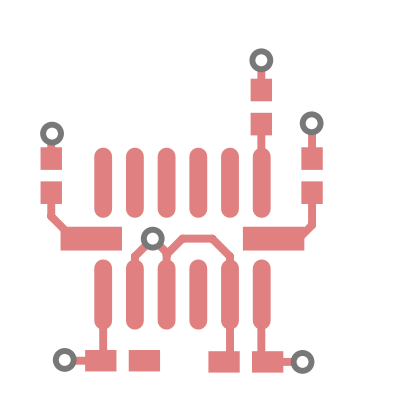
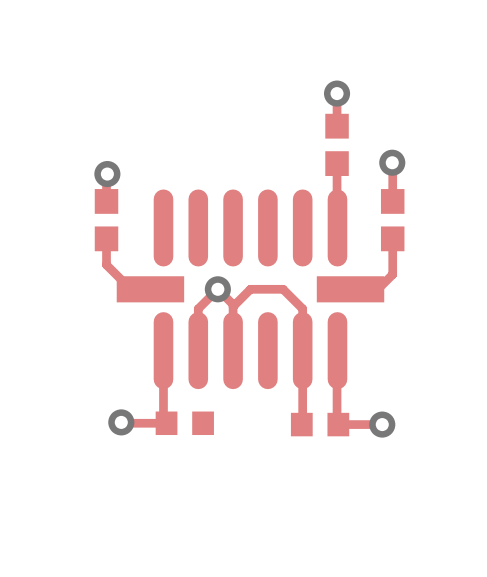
part footprint: [85, 350, 161, 372] -> [155, 411, 214, 436]
part footprint: [208, 351, 284, 373] -> [290, 412, 350, 437]

